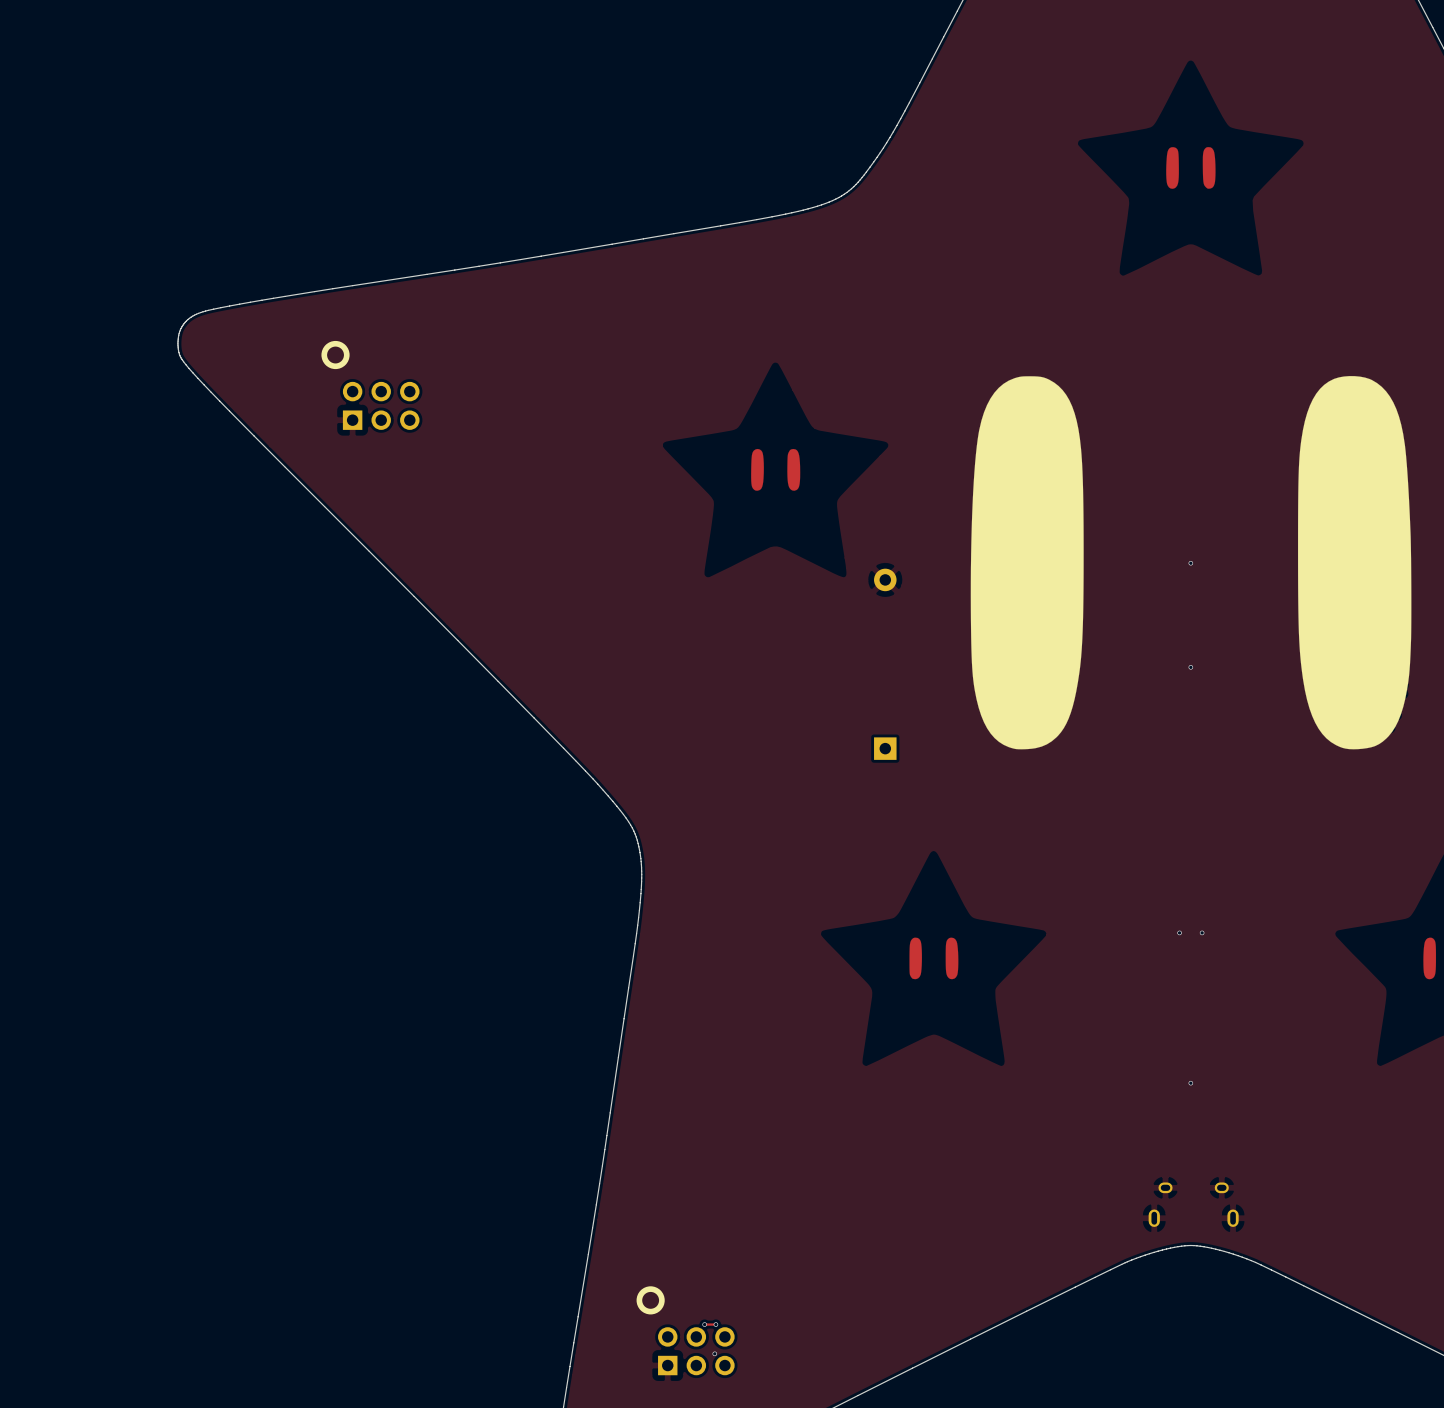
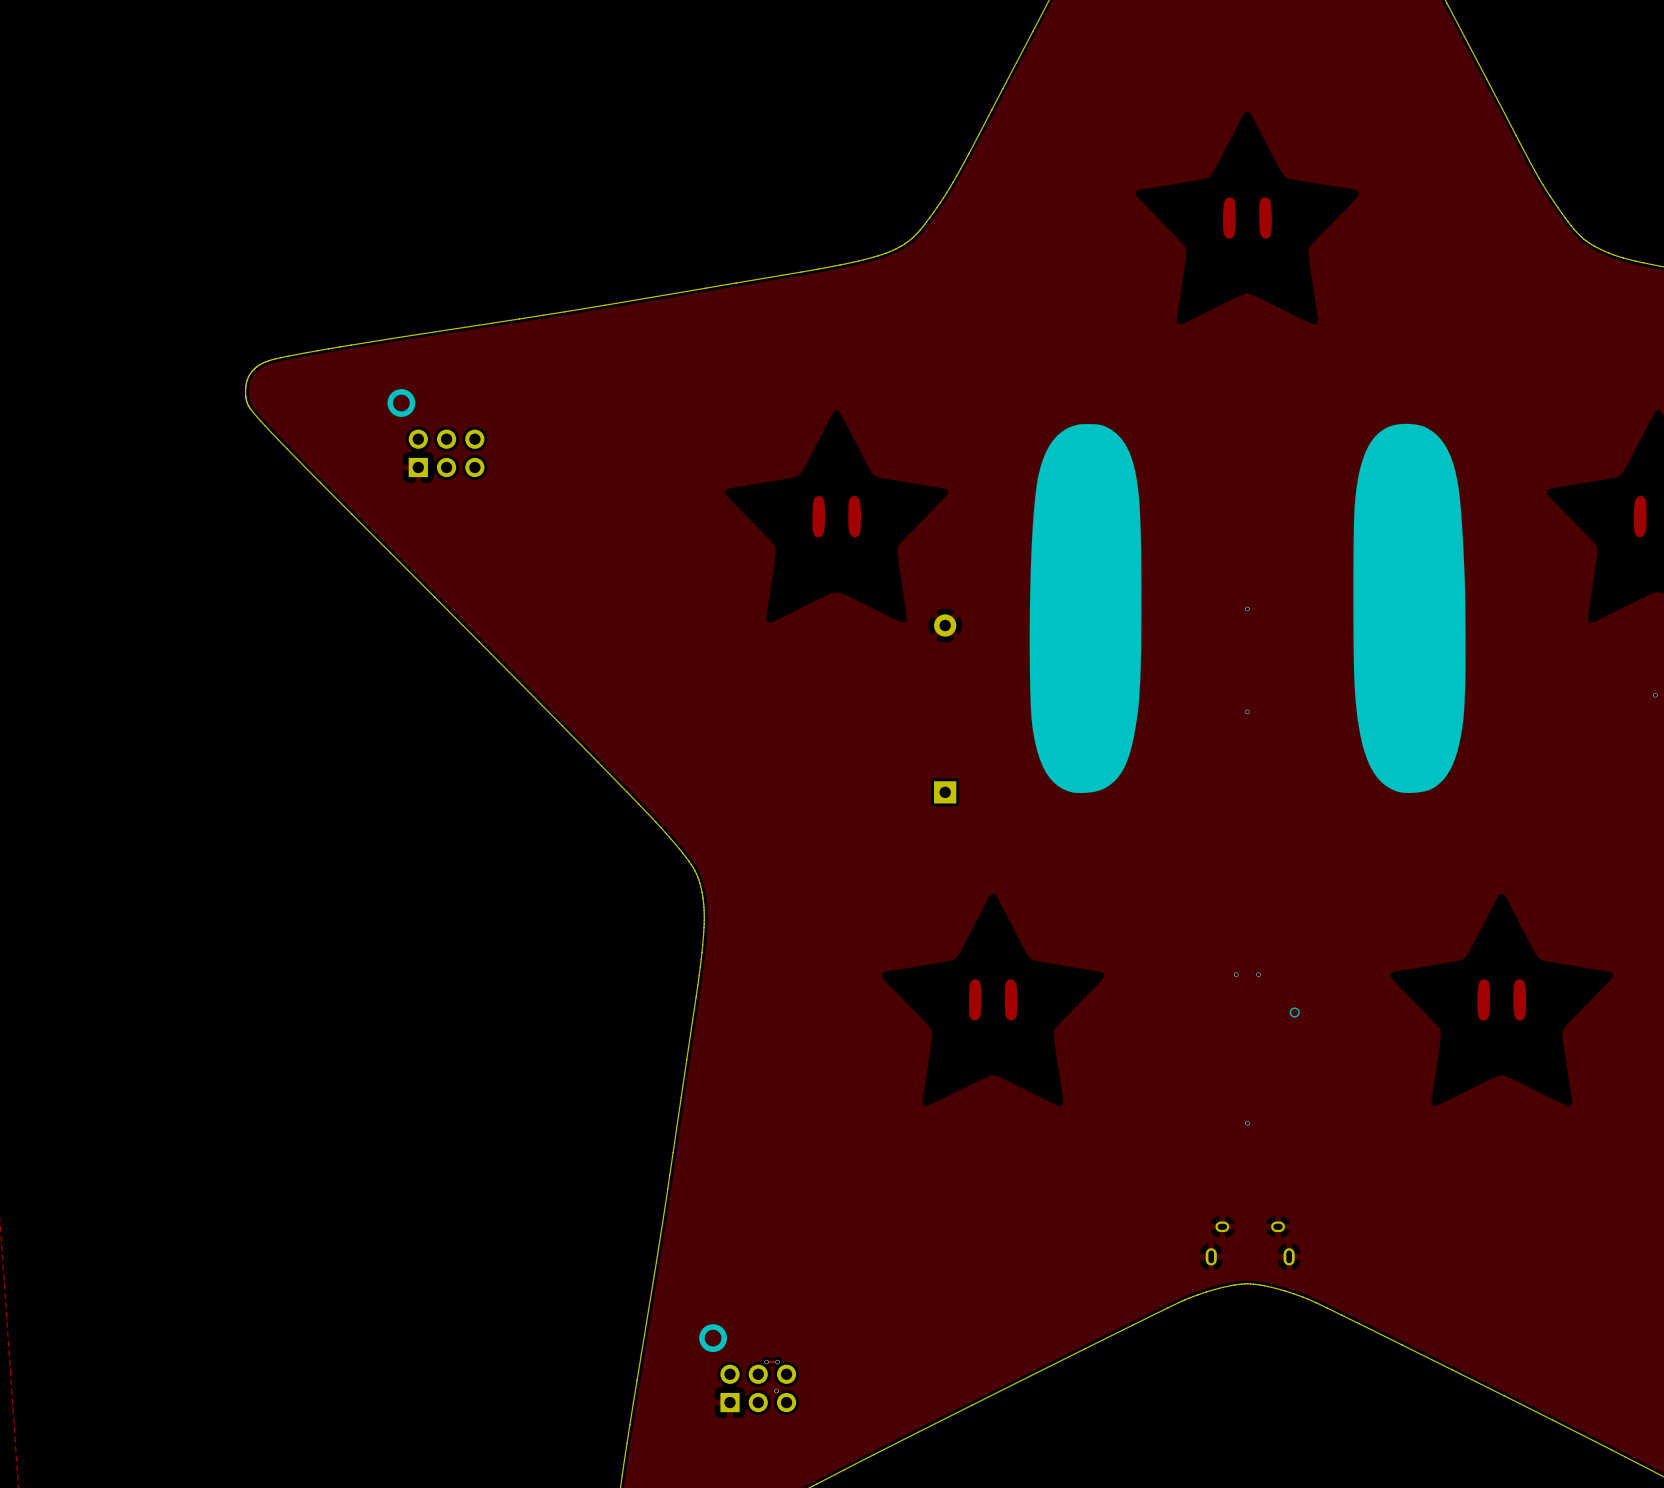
drawing: none -> [1289, 1007, 1300, 1018]

